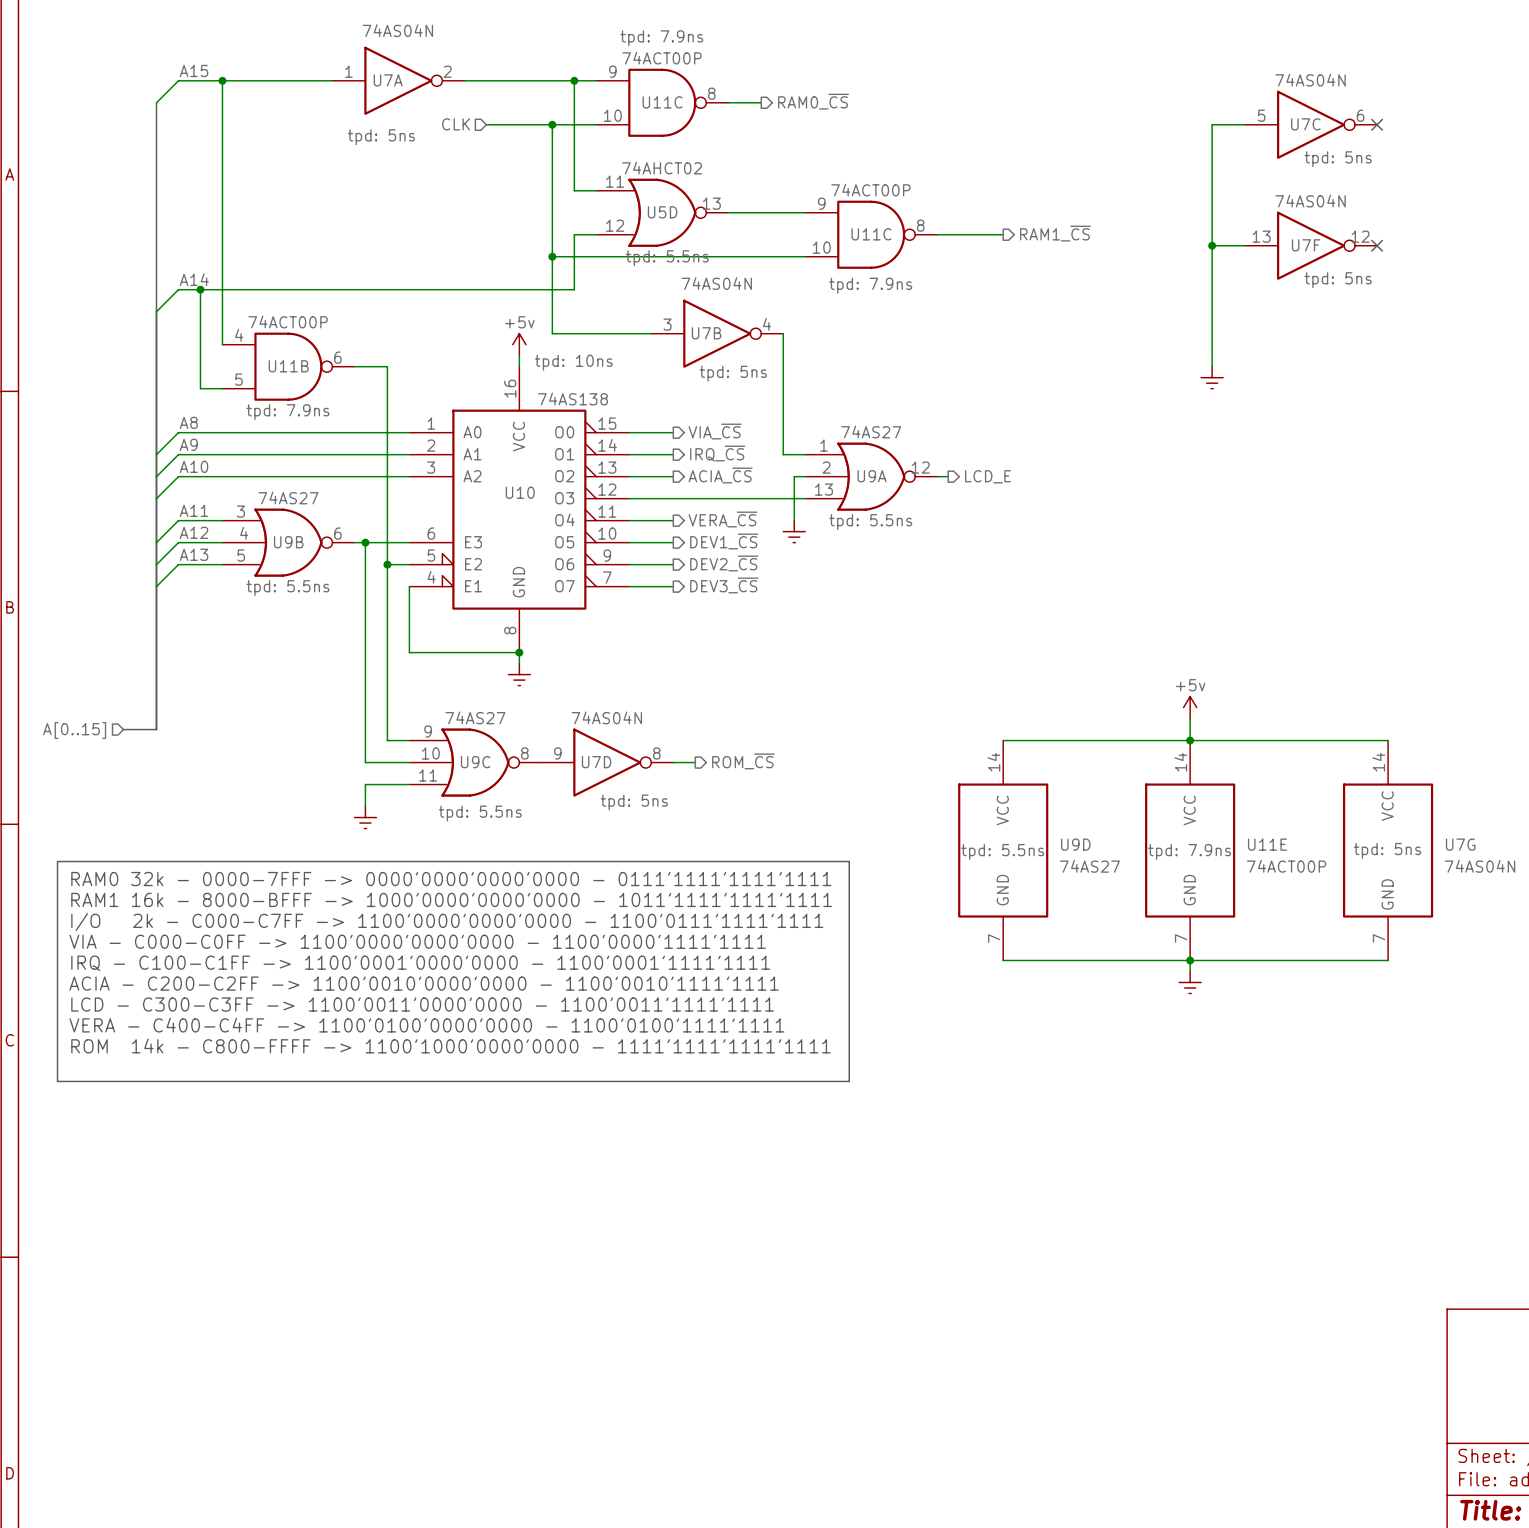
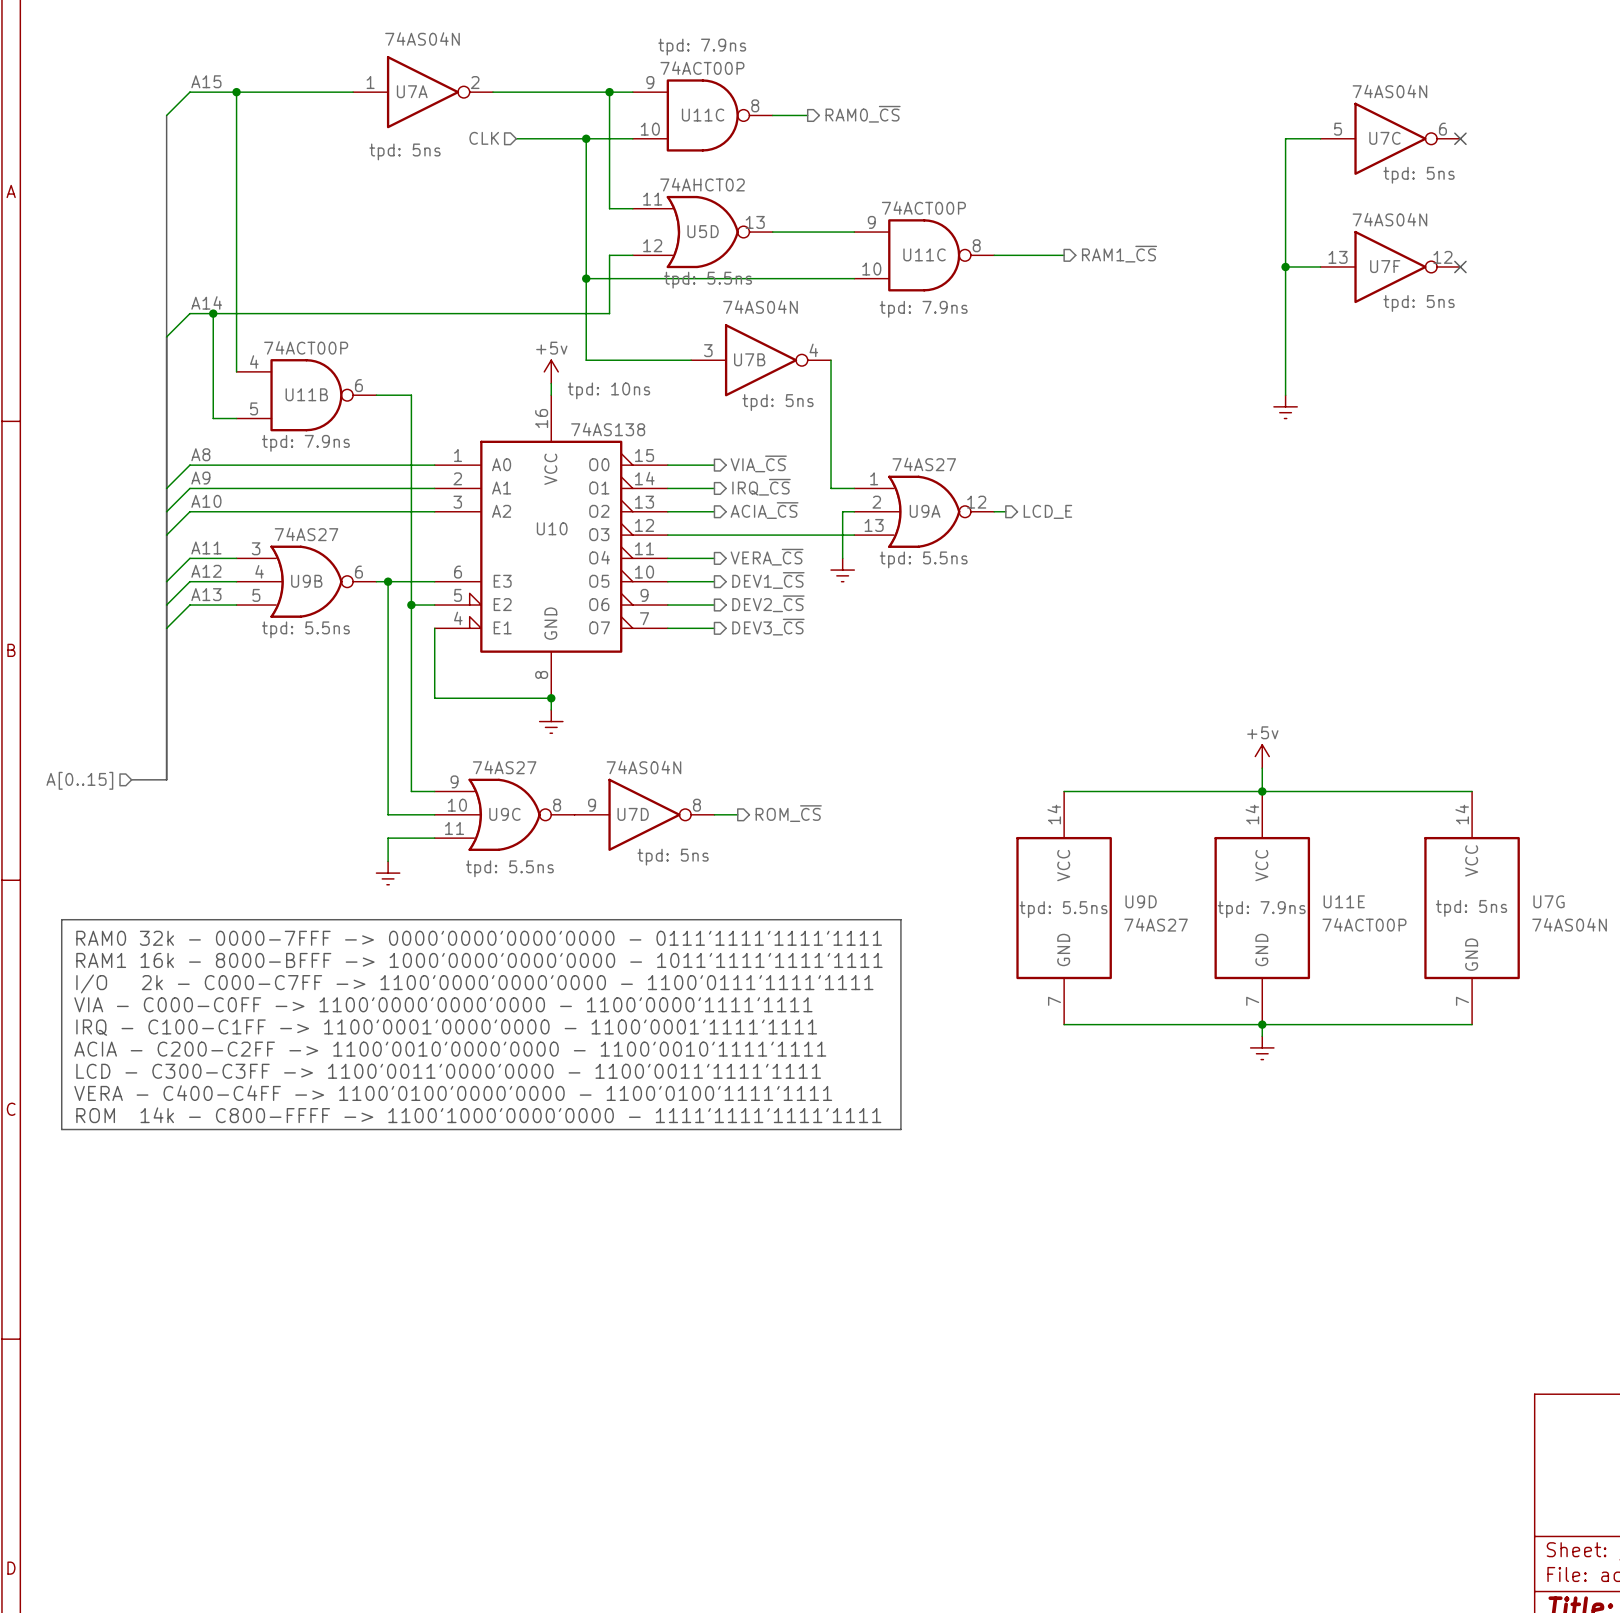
line: (57, 1059) (57, 1081) (849, 1081) (849, 1059) -> (61, 1129) (900, 1129)

